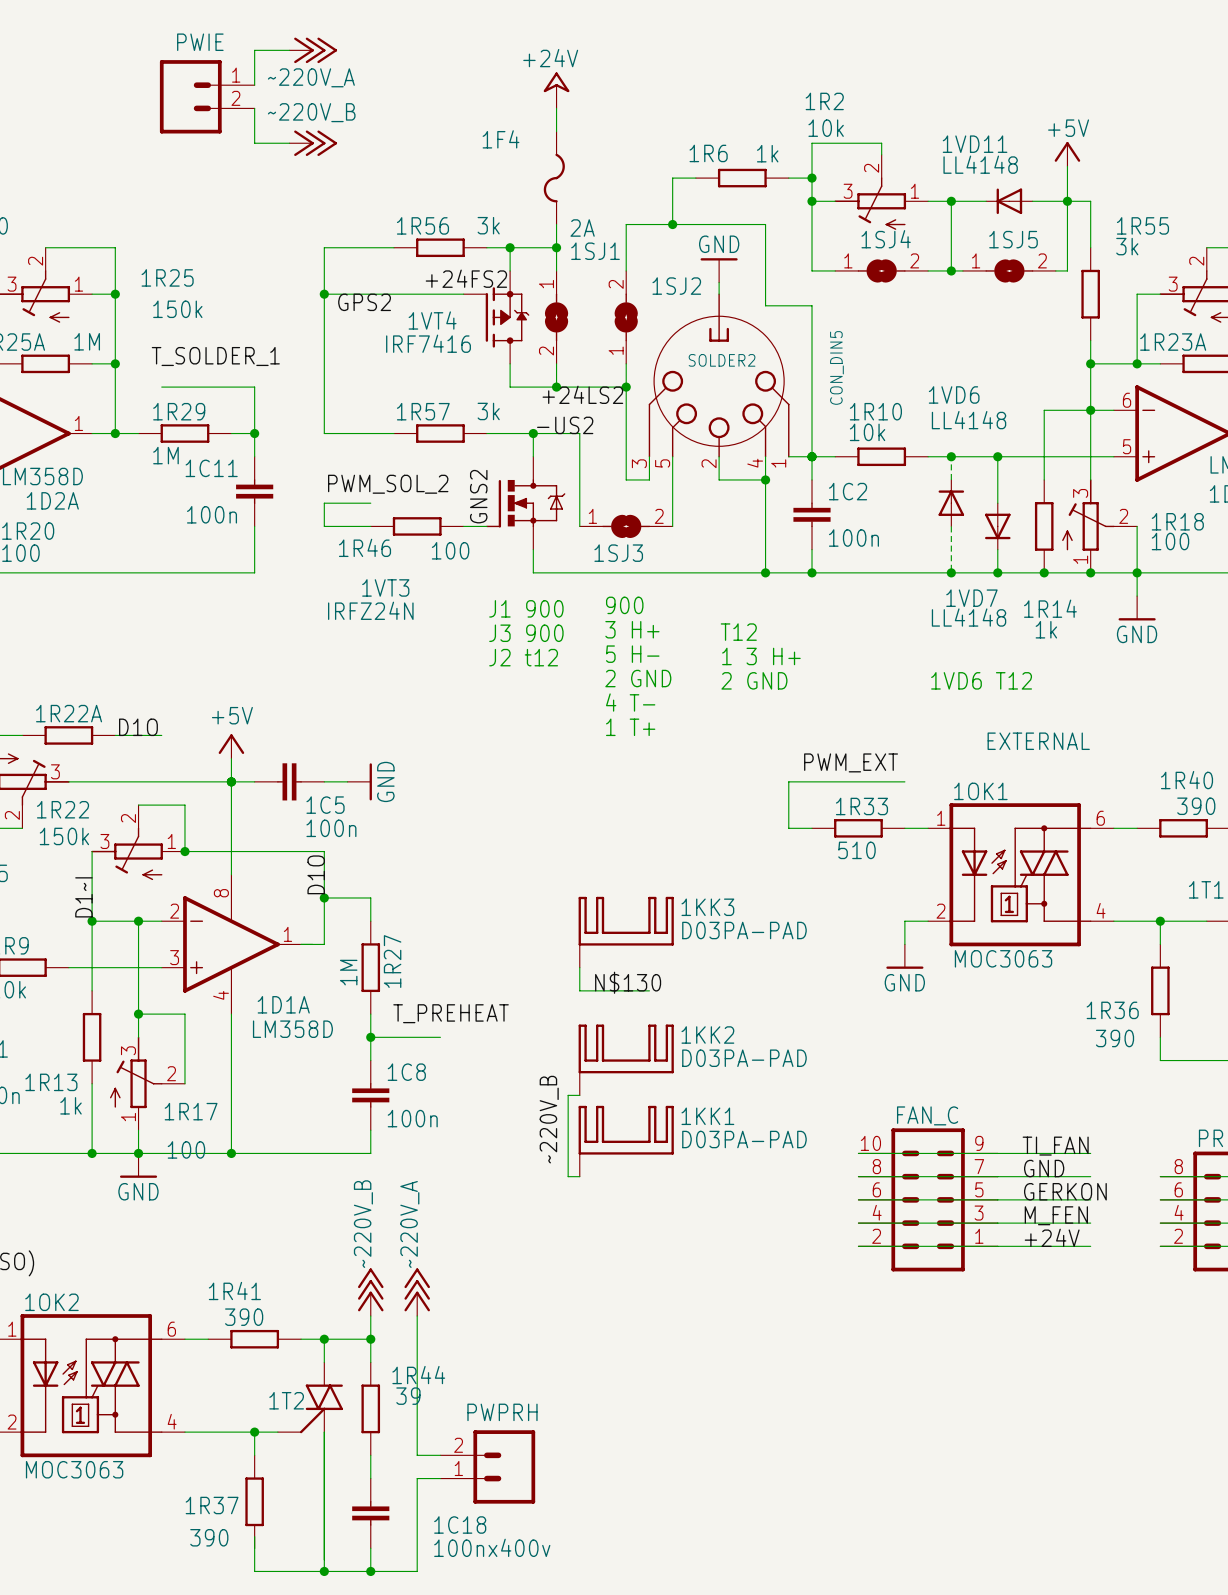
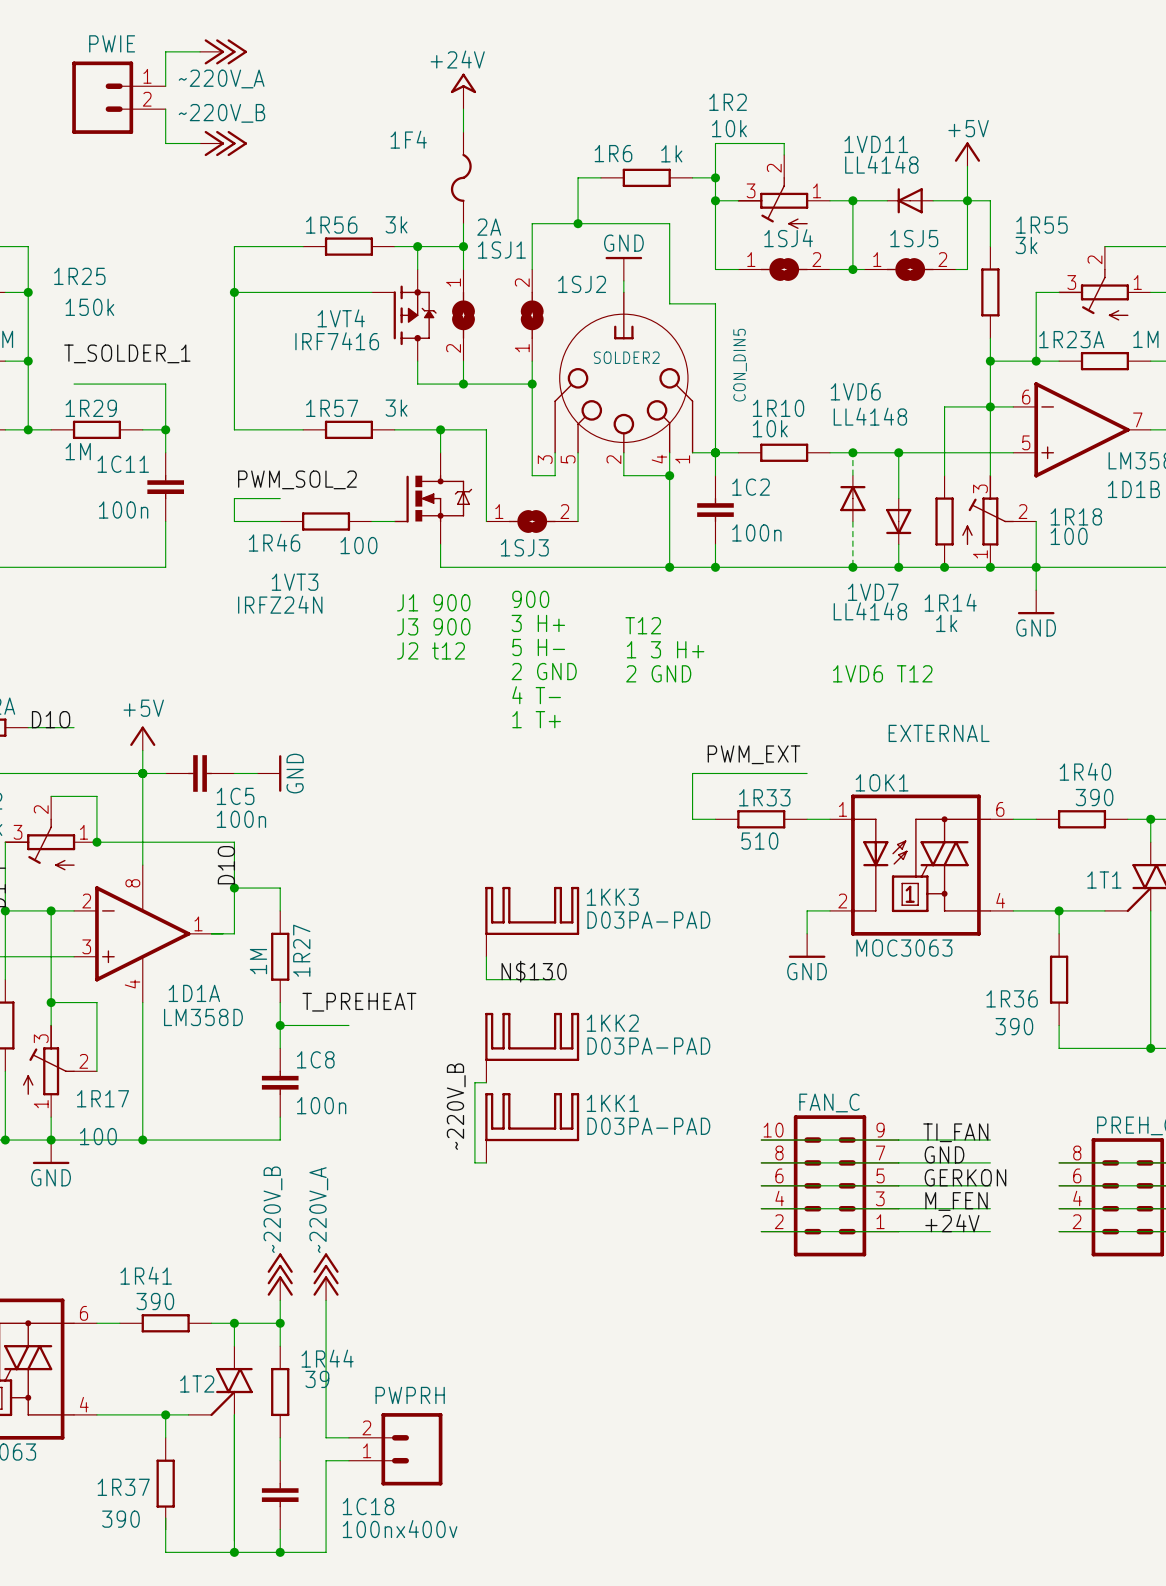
label: +24FS2 (466, 278) -> none
label: GPS2 (364, 302) -> none
label: +24LS2 (582, 394) -> none
label: -US2 (565, 425) -> none
label: GNS2 (478, 496) -> none

